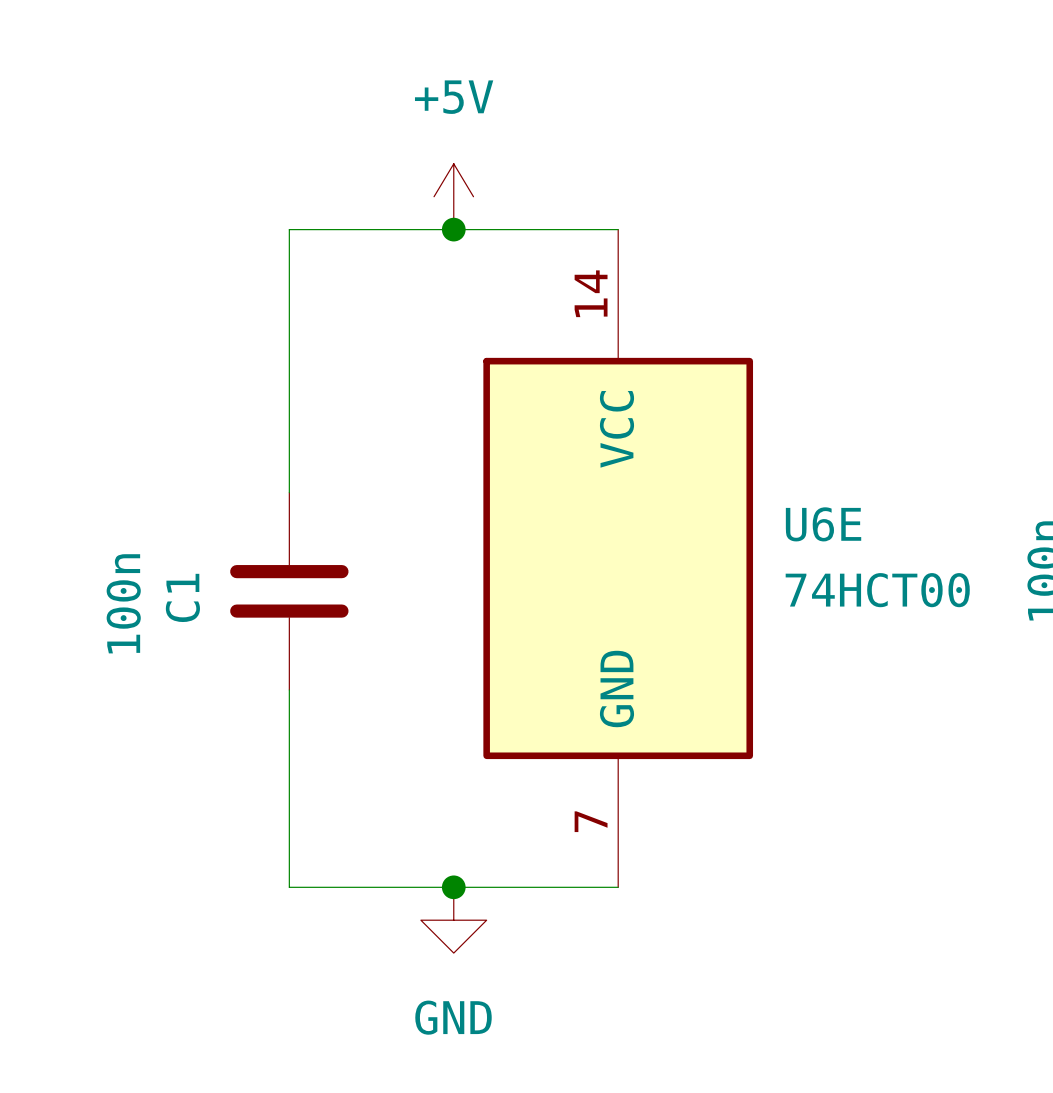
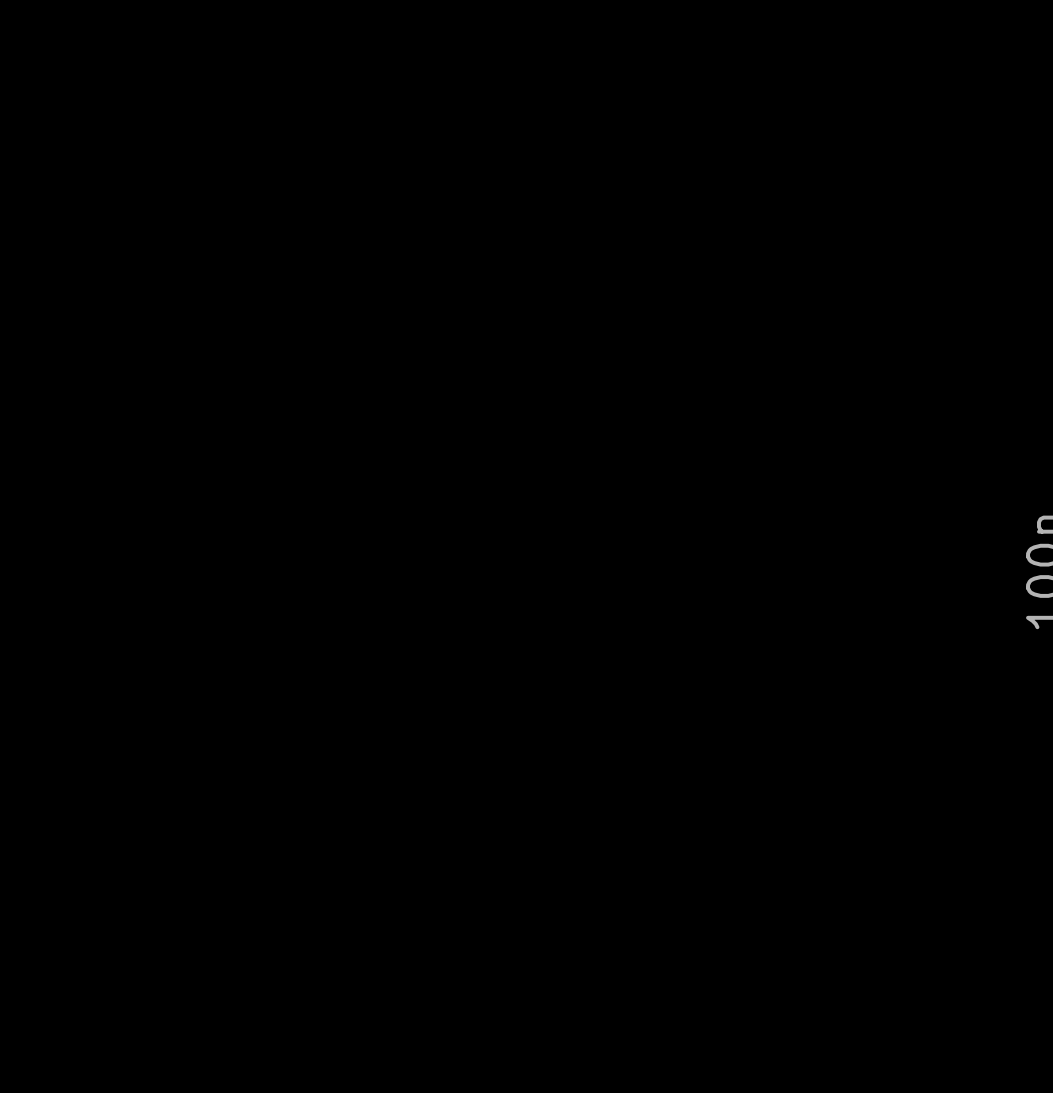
power symbol: +5V (453, 196) -> none
junction: (453, 229) -> none
wire: (618, 229) (289, 229) (289, 492) -> none
U6E: 74HCT00 (618, 558) -> none
C1: 100n (289, 591) -> none
wire: (289, 690) (289, 887) (618, 887) -> none
junction: (453, 887) -> none
power symbol: GND (453, 920) -> none

